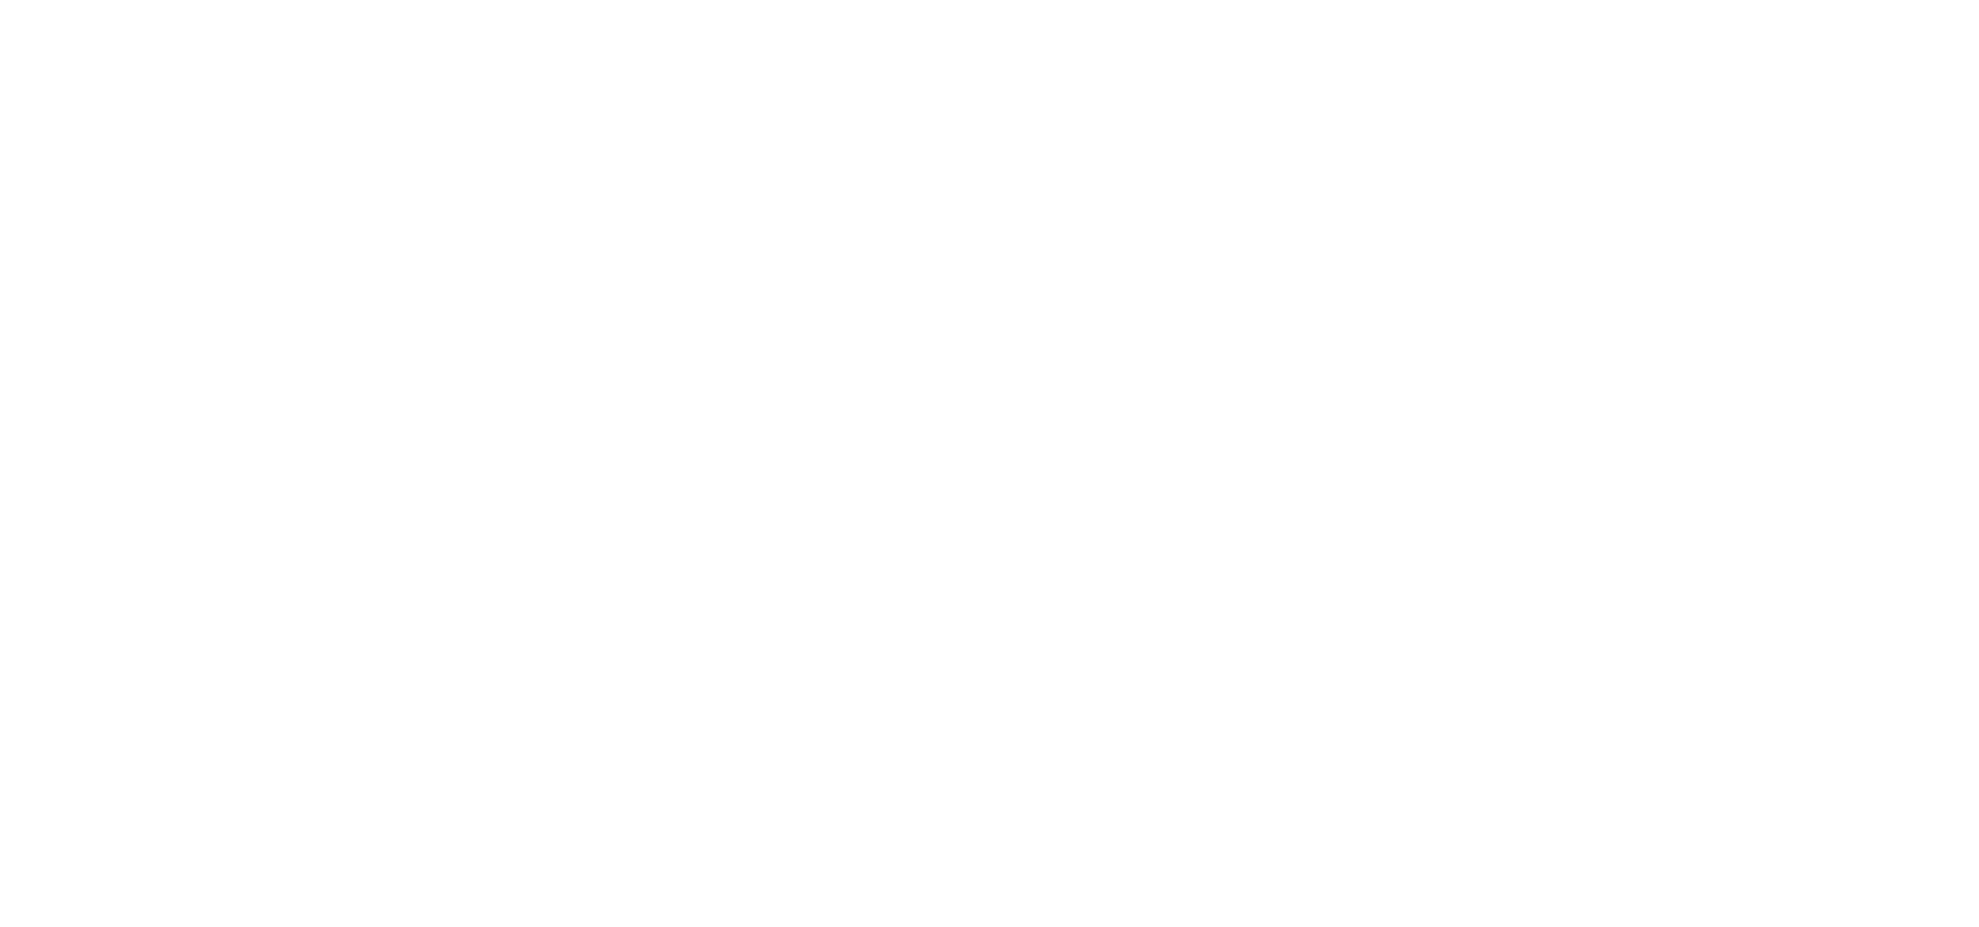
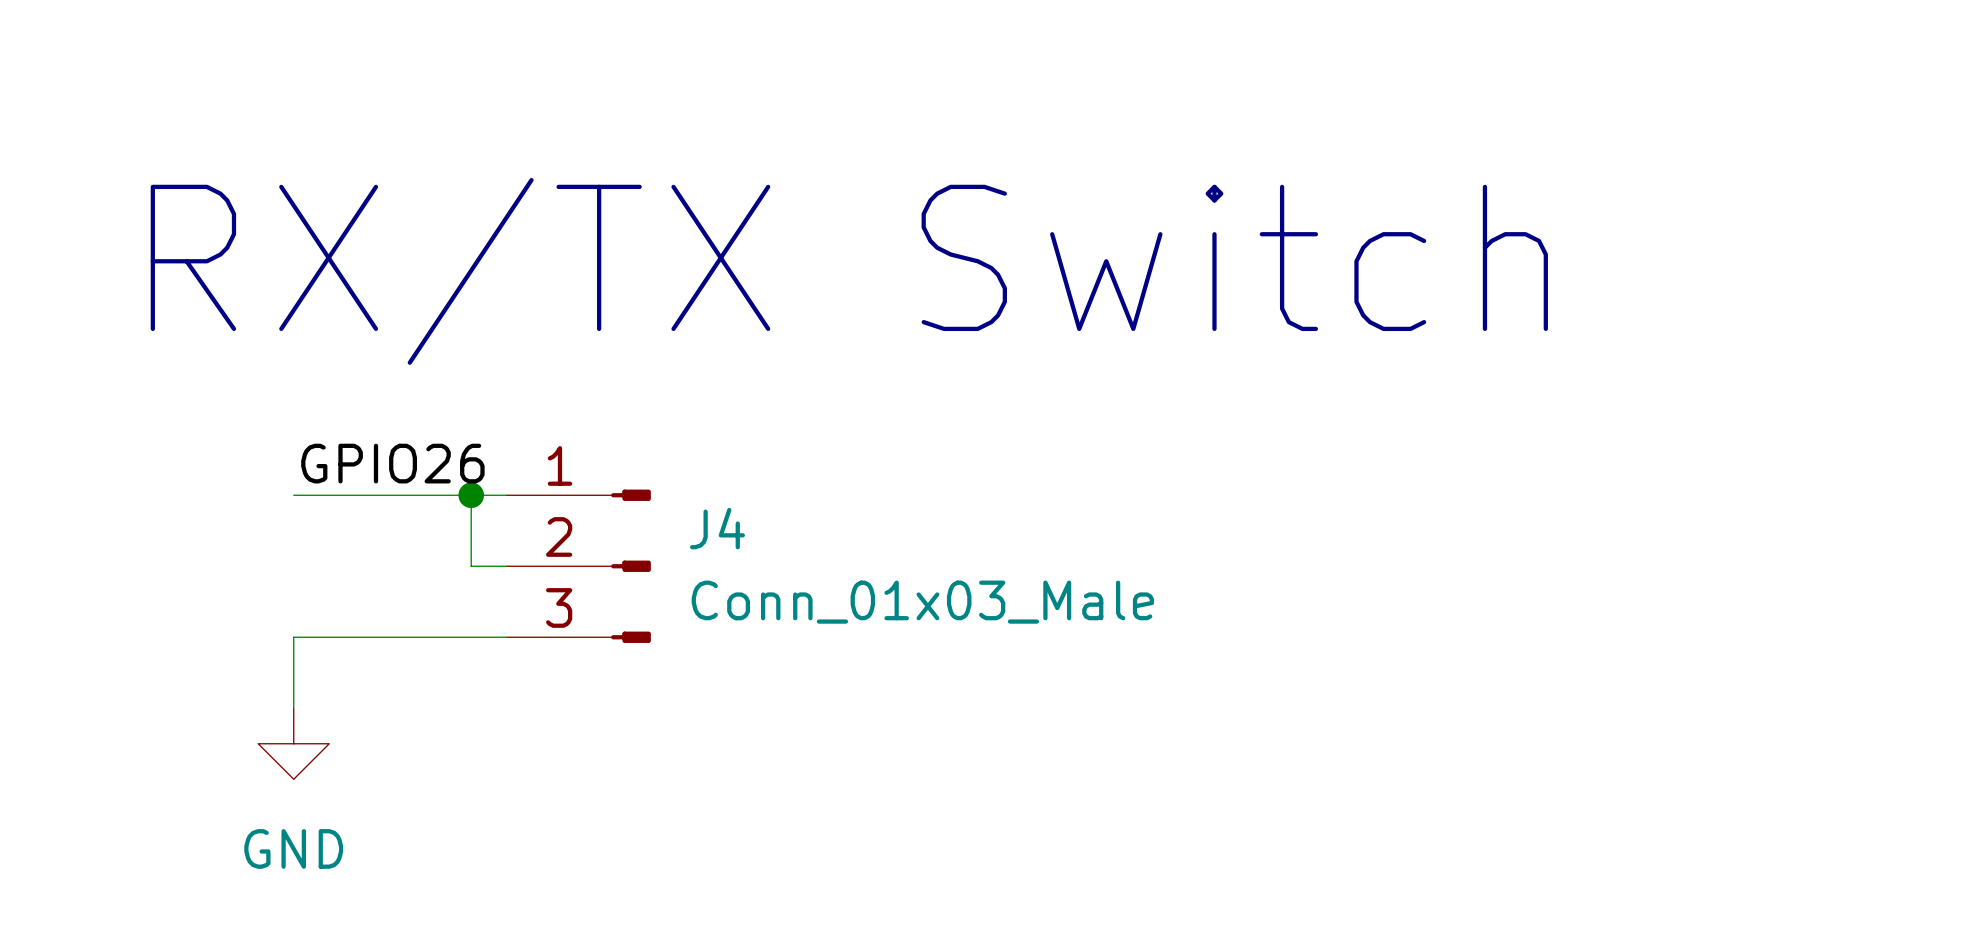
text: none -> RX/TX Switch (849, 271)
label: none -> GPIO26 (392, 463)
wire: none -> (293, 495) (506, 495)
wire: none -> (471, 495) (471, 566) (506, 566)
junction: none -> (471, 495)
J4: none -> Conn_01x03_Male (578, 566)
wire: none -> (506, 637) (293, 637) (293, 708)
power symbol: none -> GND (293, 743)

